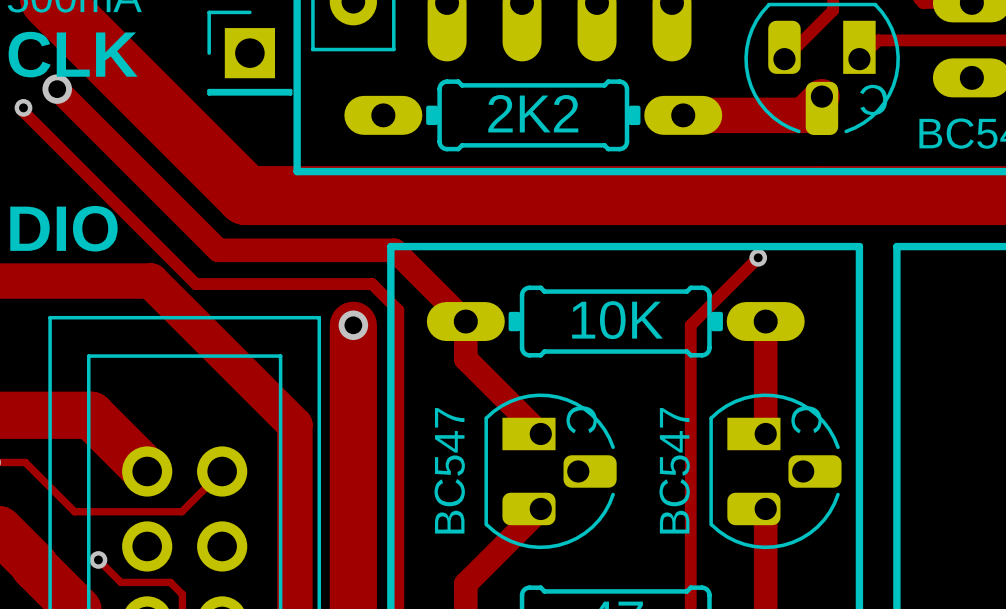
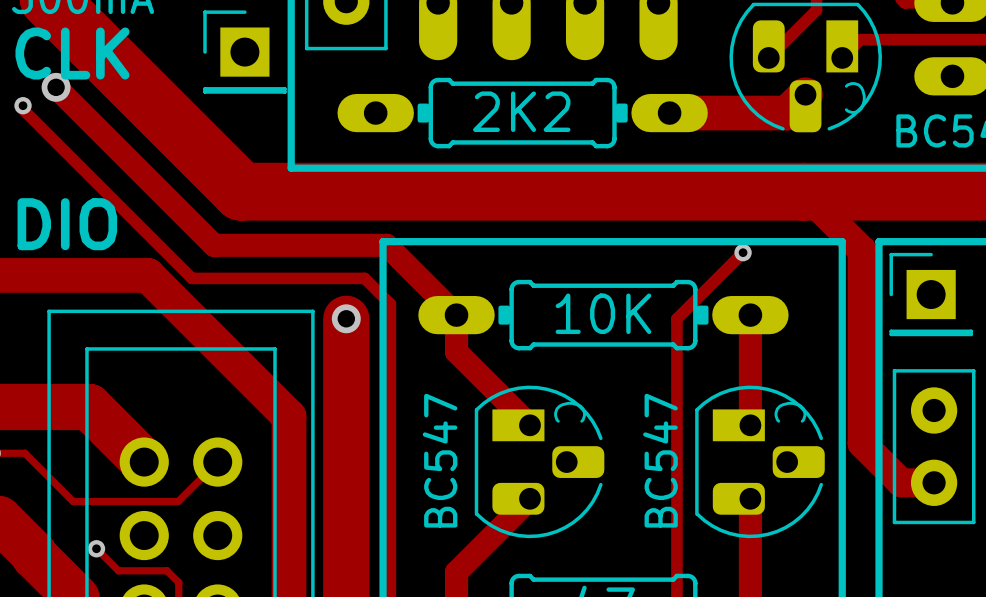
track: none -> (803, 191) (862, 250) (862, 443) (901, 482) (934, 482)
part: none -> (931, 294)
part: none -> (934, 446)

